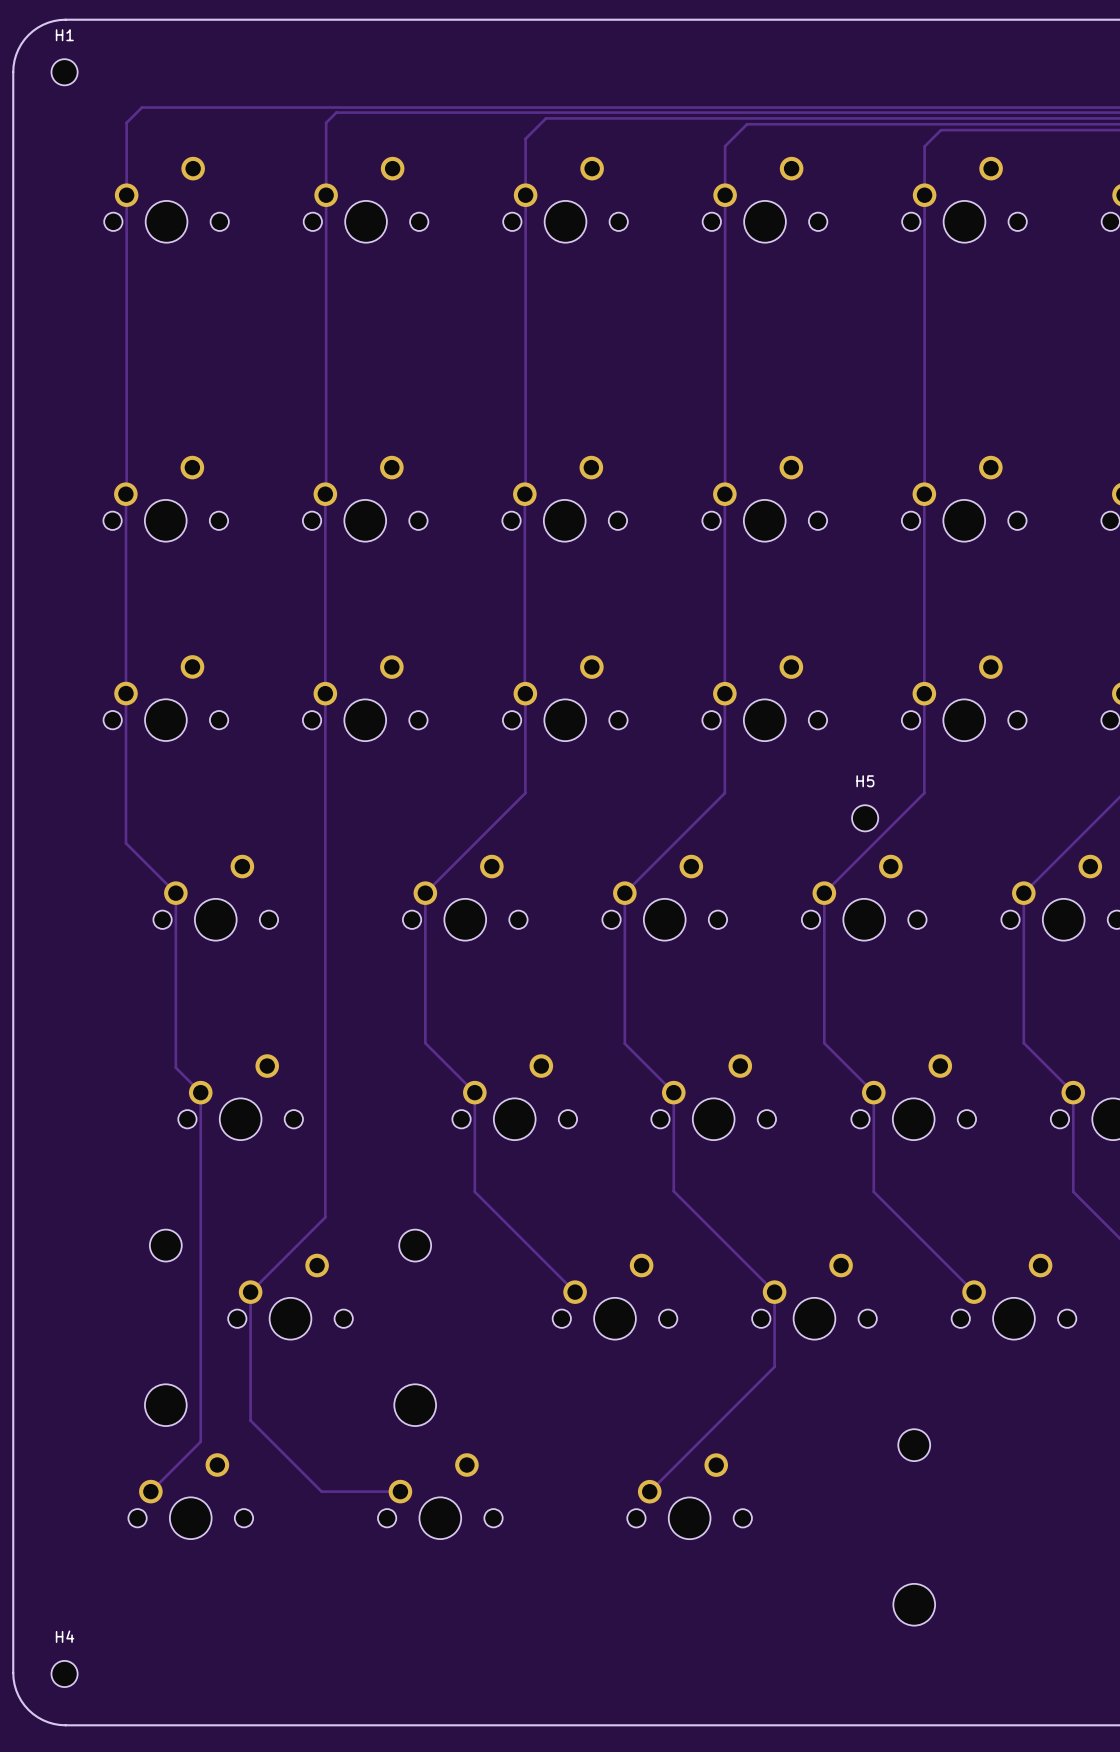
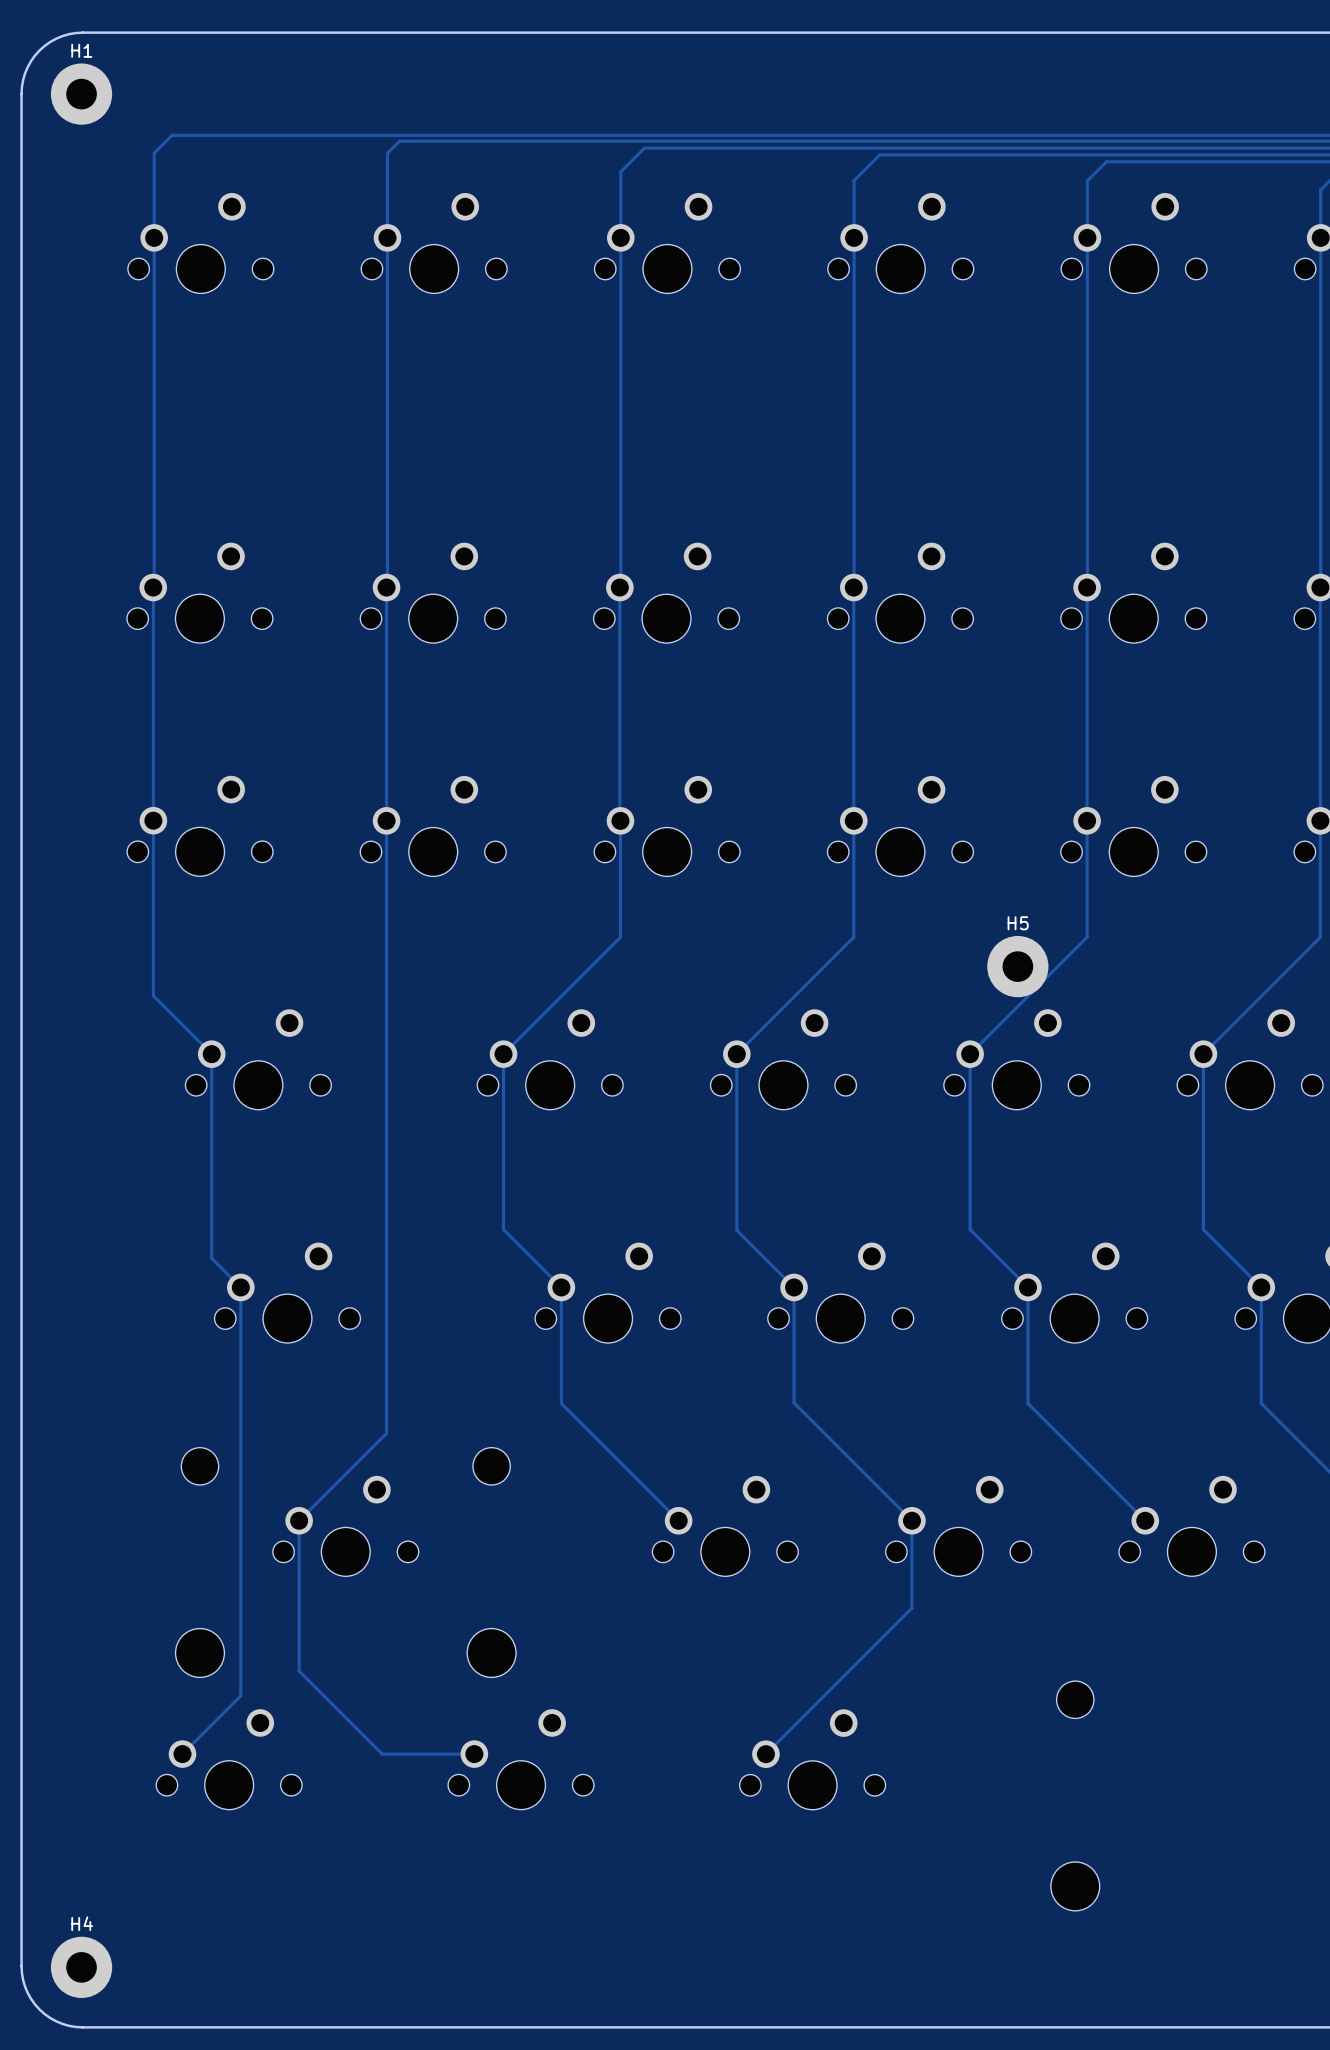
H1 footprint: [51, 59, 78, 86] -> [50, 63, 113, 125]
H5 footprint: [852, 805, 879, 832] -> [987, 935, 1049, 998]
H4 footprint: [51, 1660, 78, 1688] -> [50, 1936, 113, 1998]

